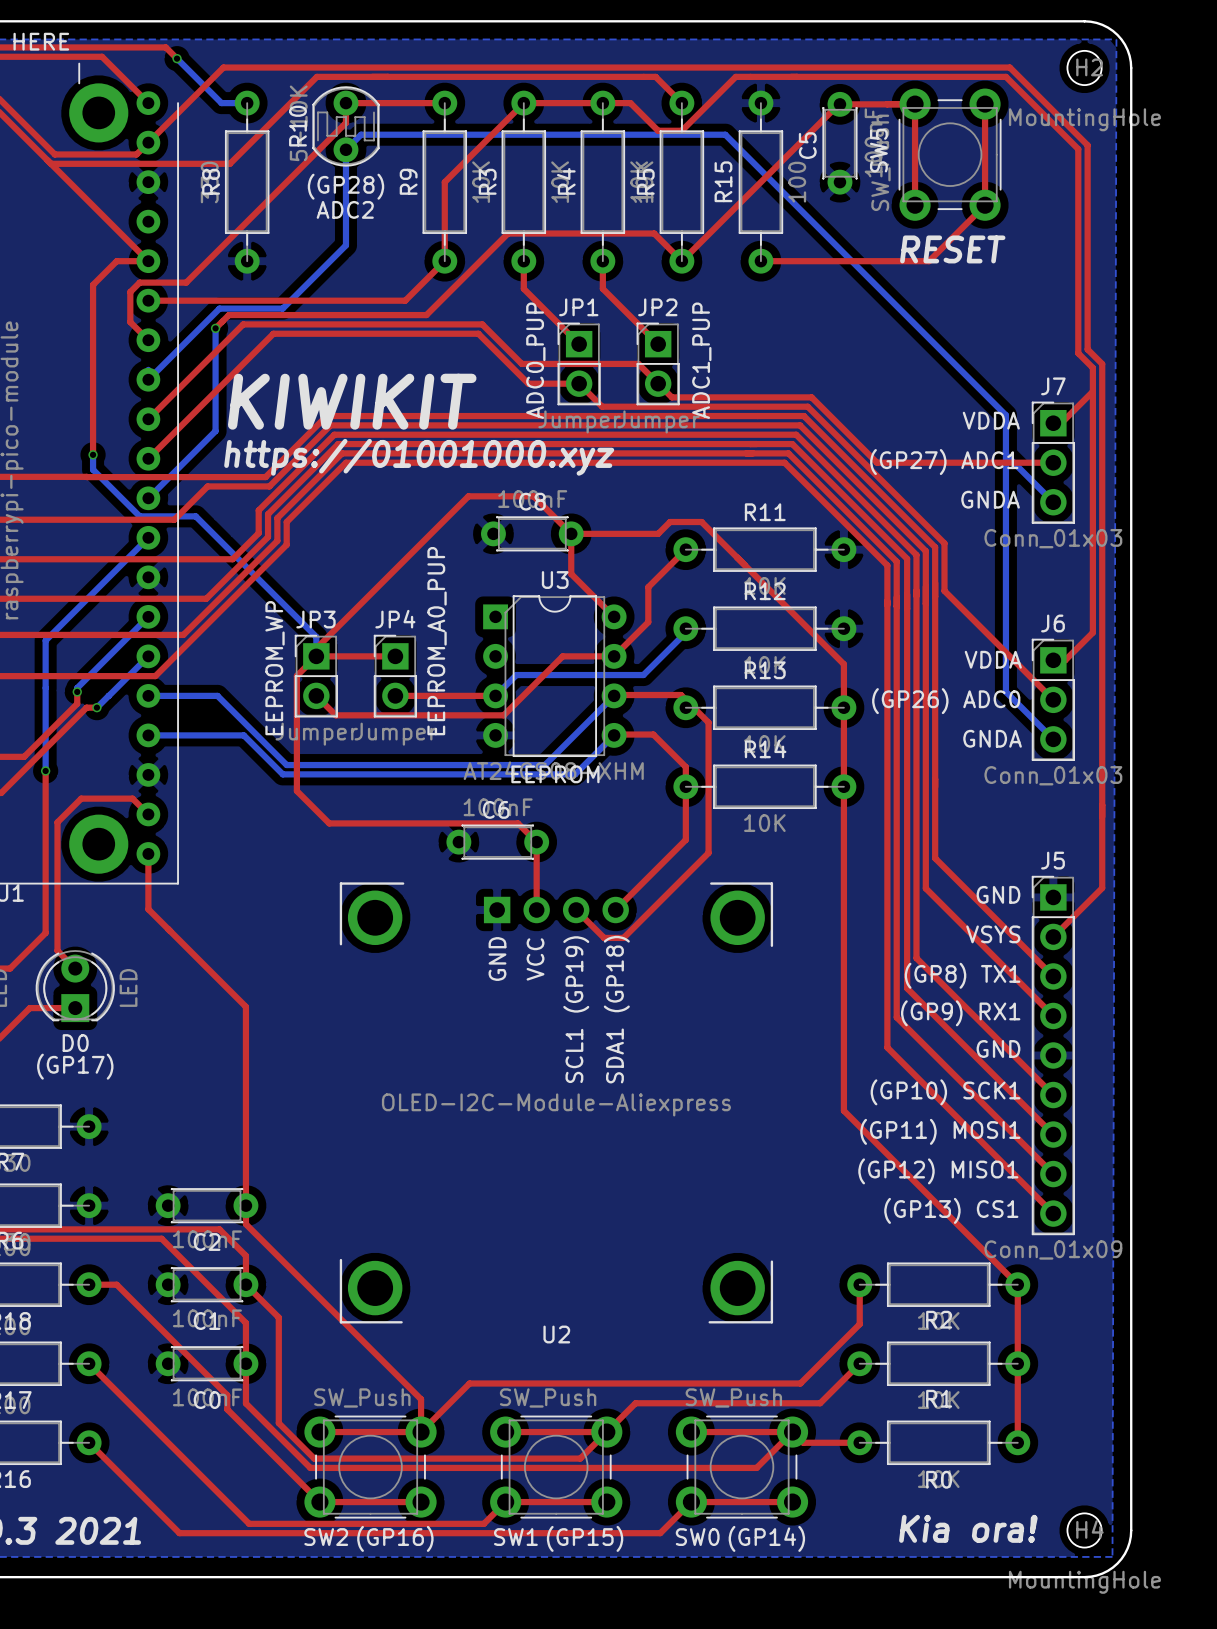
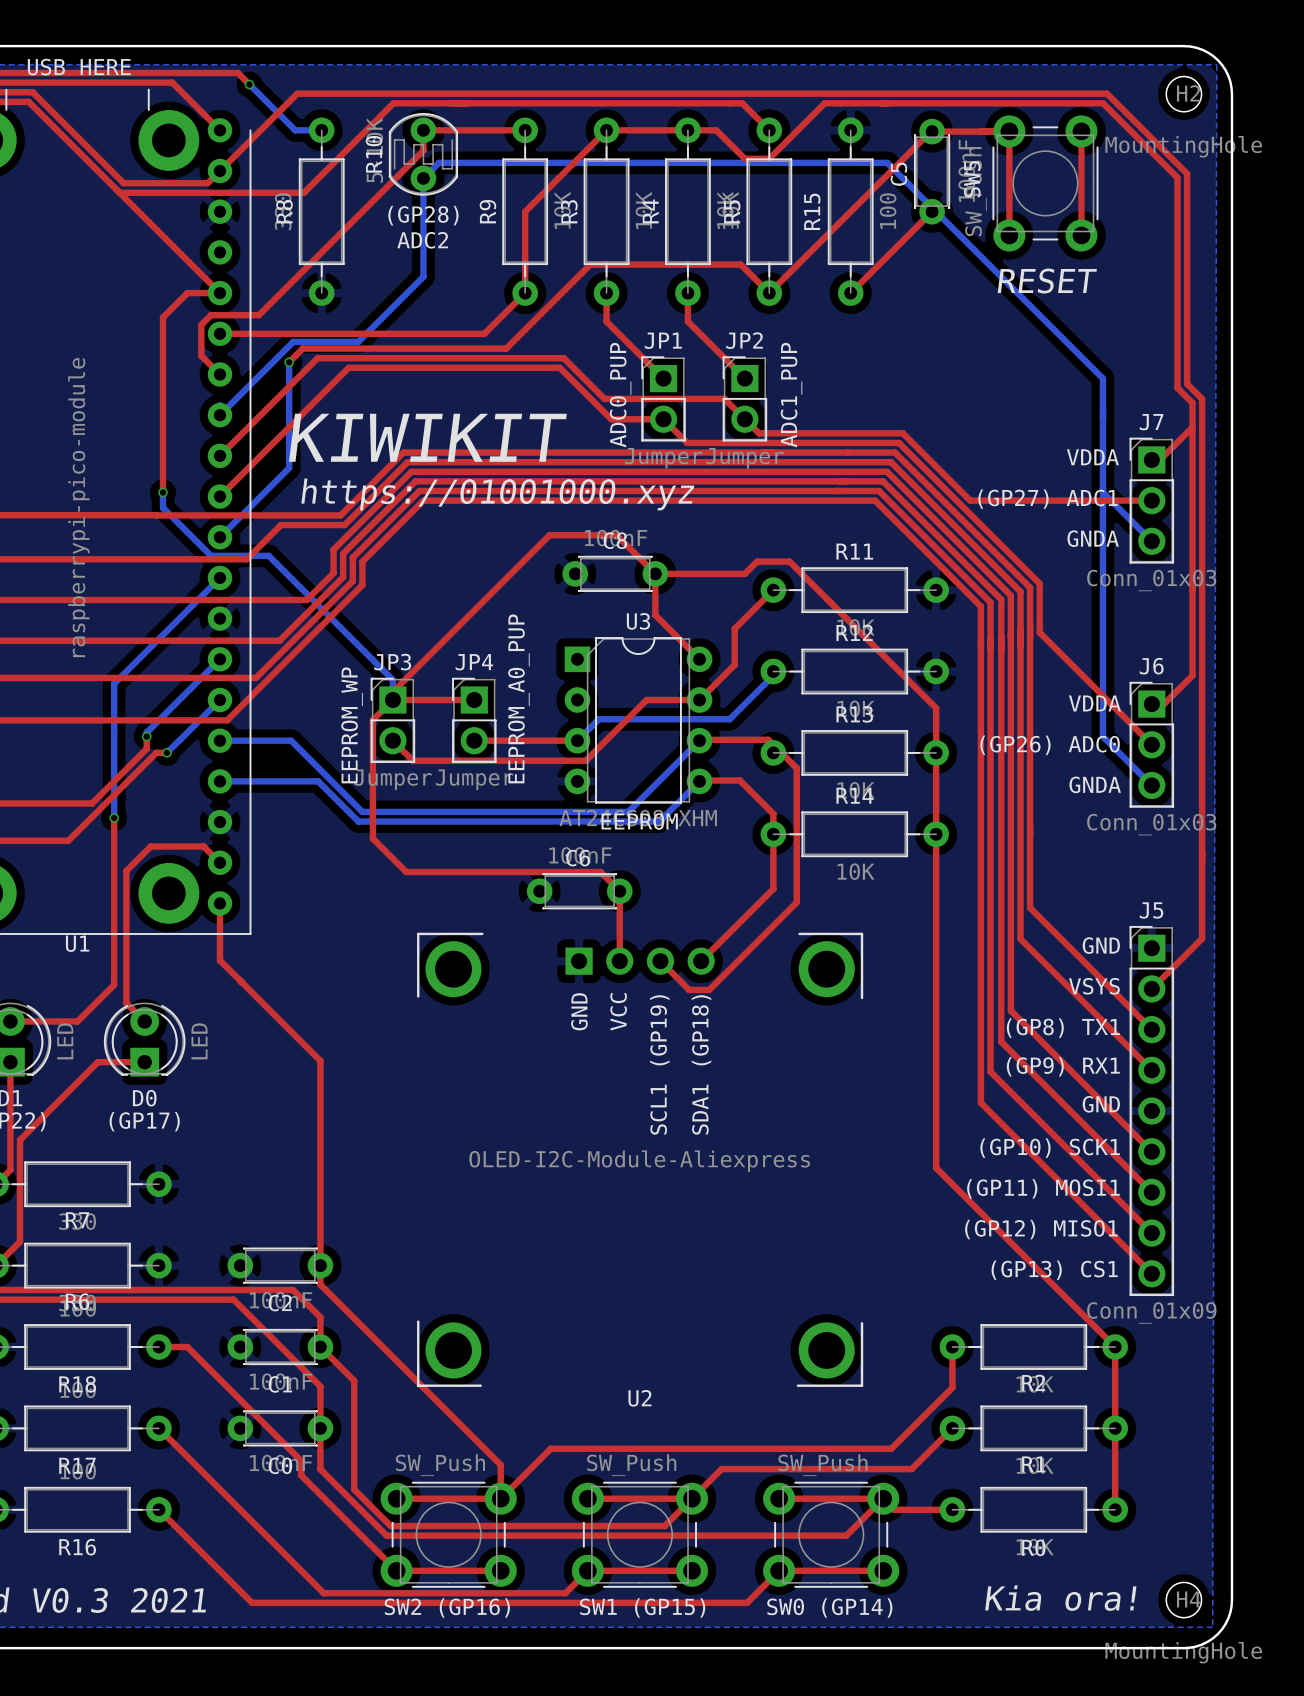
bottom track: (725, 134) (1005, 415) -> (814, 162) (887, 162) (1102, 378) (1102, 451)
top track: (985, 205) (929, 261) (760, 261) -> (932, 211) (850, 293)

